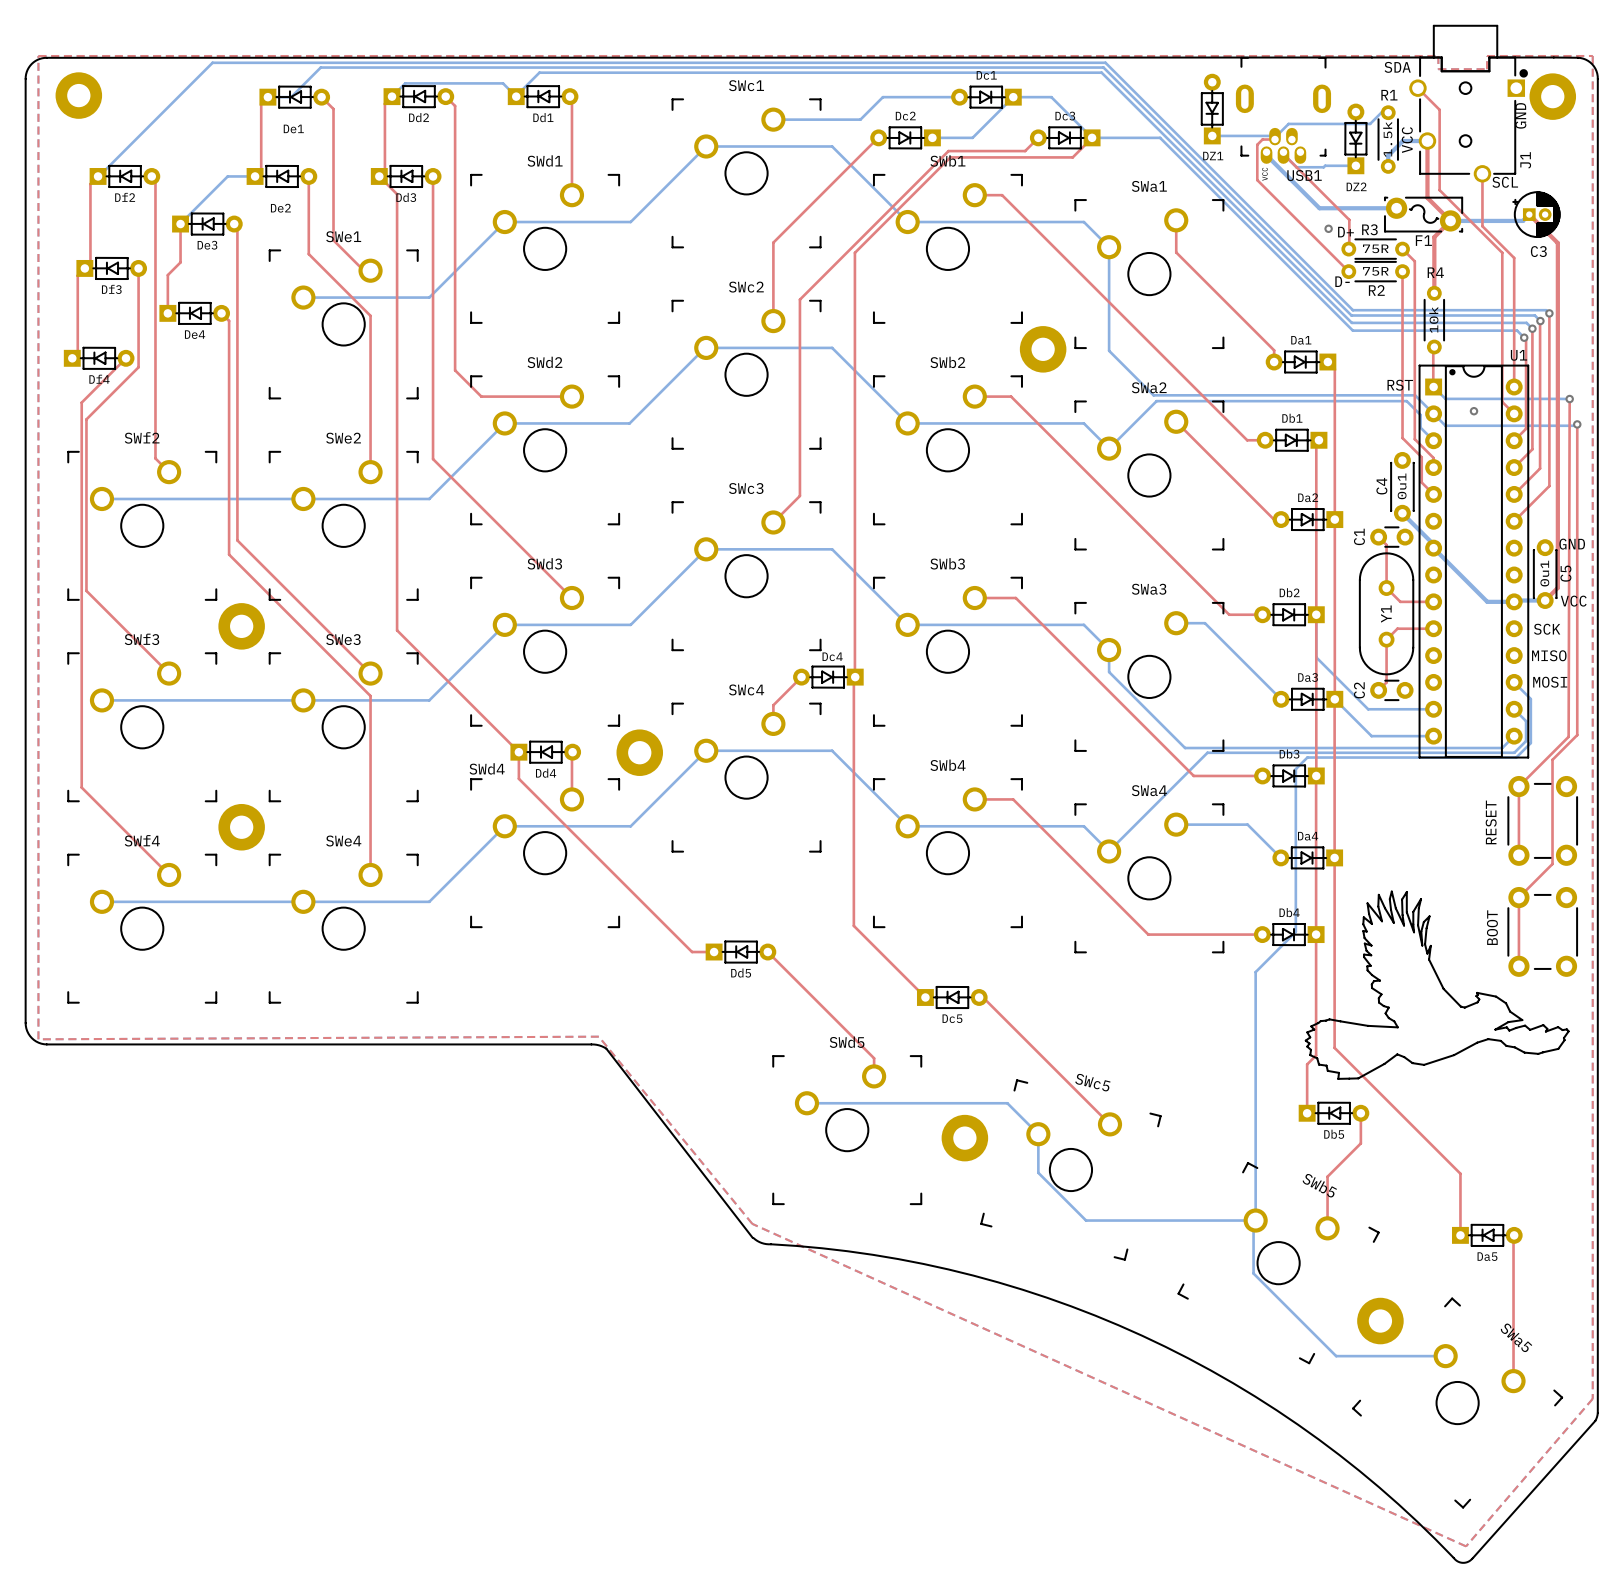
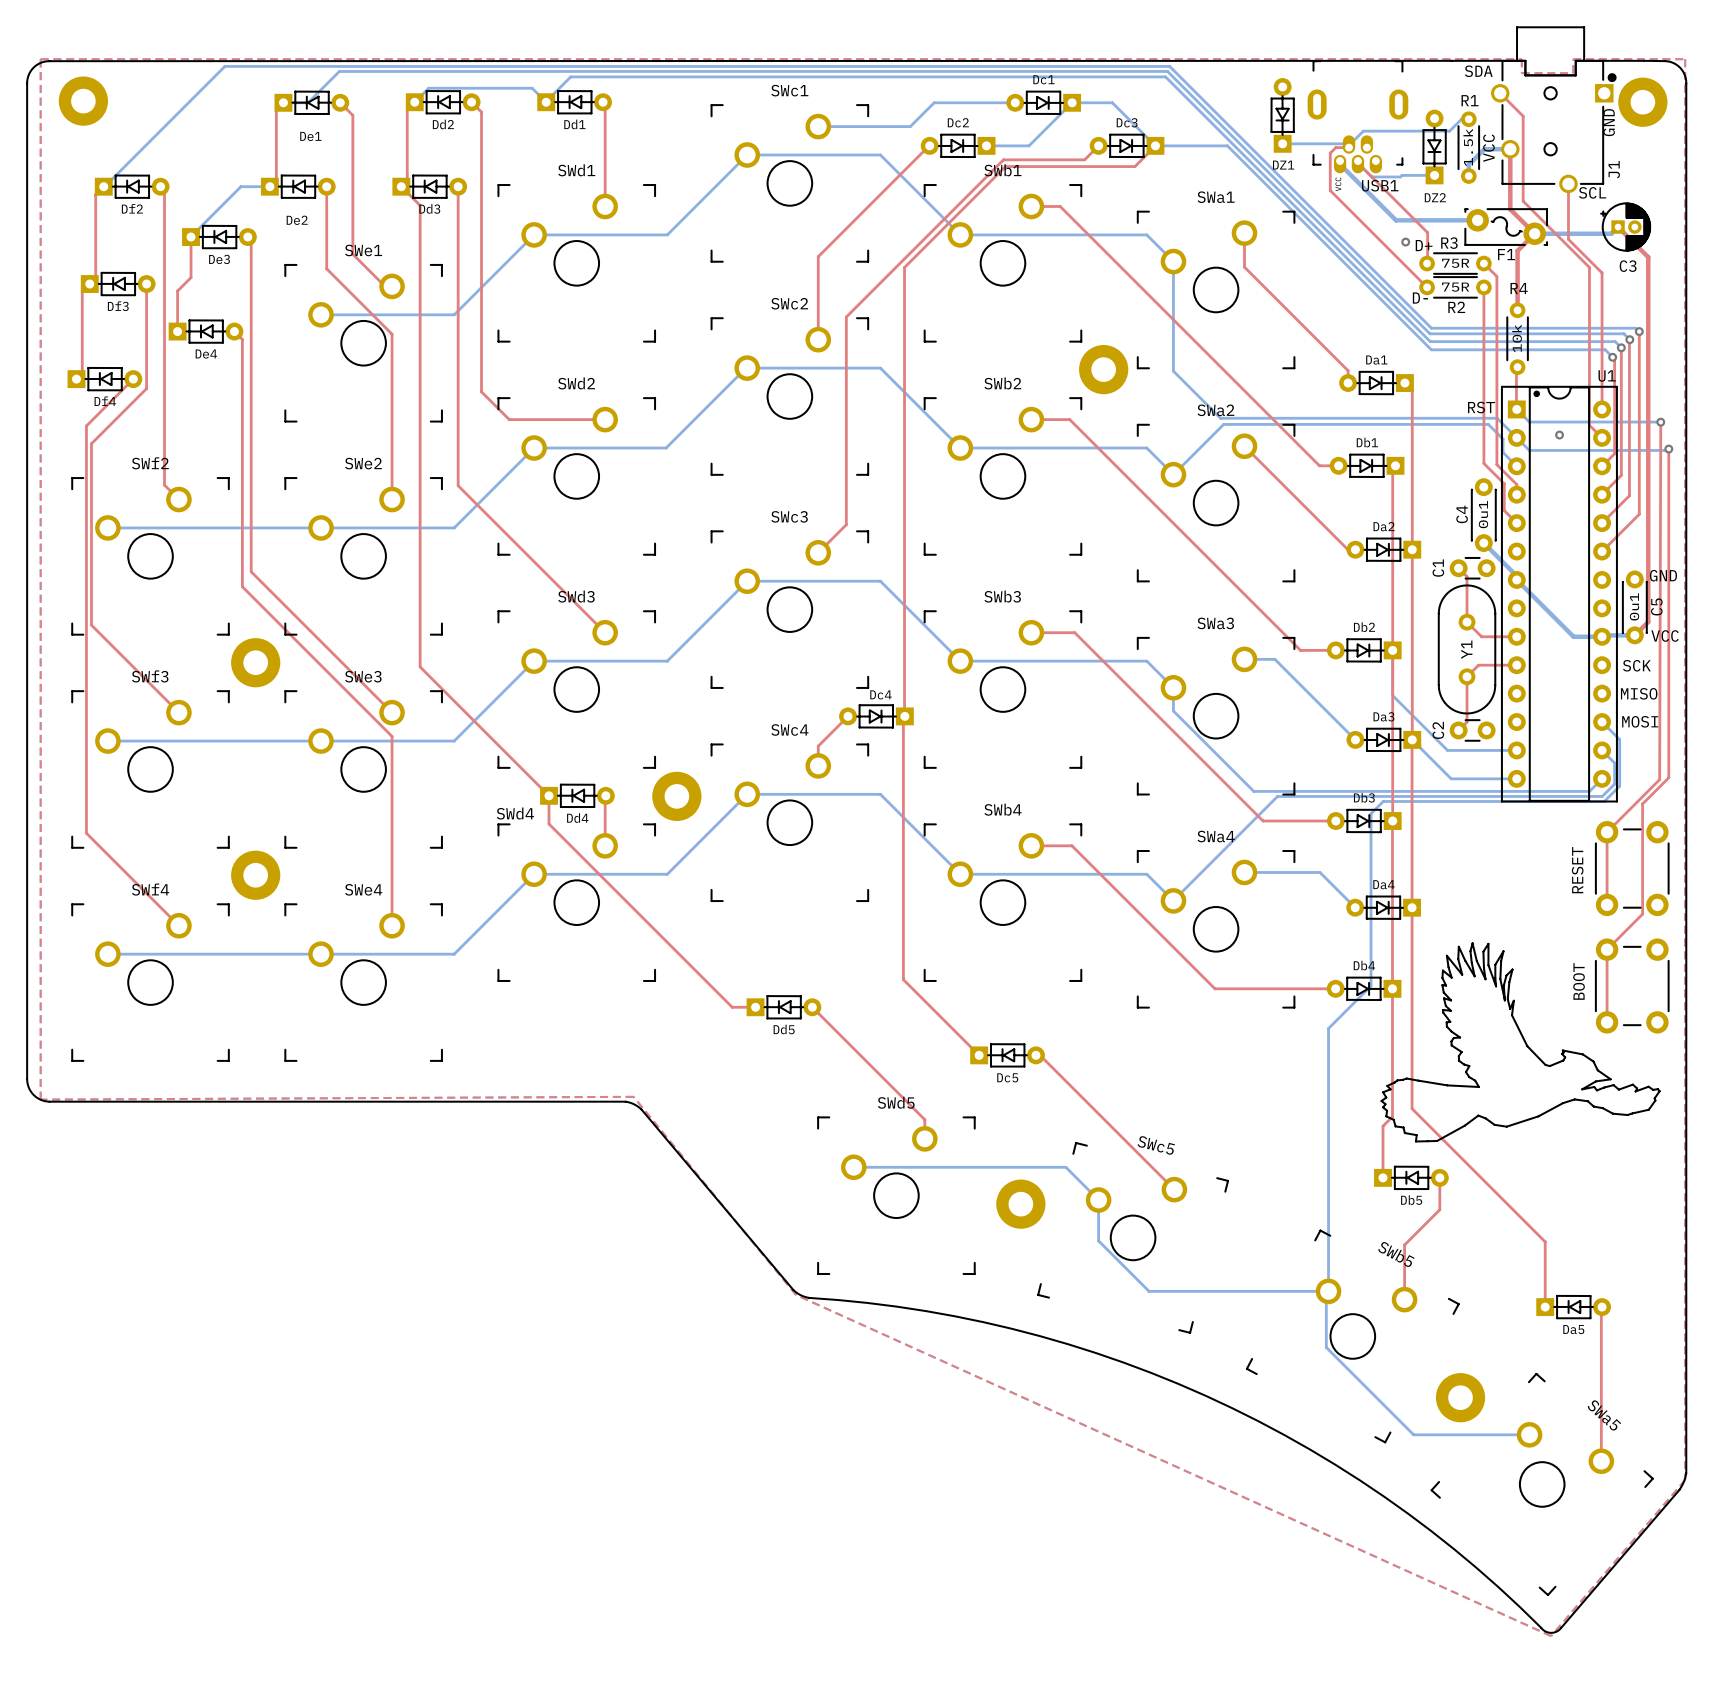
board edge: (1553, 57) (1585, 59) (1593, 66) (1597, 78) (1597, 1413) (1595, 1420) (1472, 1558) -> none
board edge: (25, 1019) (26, 1028) (29, 1035) (38, 1042) (46, 1044) (599, 1045) (606, 1048) (752, 1237) -> (27, 1078) (28, 1087) (33, 1094) (40, 1099) (49, 1101) (631, 1103) (641, 1109) (798, 1293) (809, 1297) (867, 1302) (925, 1311) (1011, 1328) (1096, 1353) (1151, 1372) (1205, 1395) (1284, 1434) (1359, 1480) (1407, 1513) (1454, 1549) (1498, 1587) (1543, 1629) (1549, 1632) (1557, 1630) (1679, 1489) (1686, 1473) (1686, 83) (1683, 72) (1676, 64) (1668, 61) (1643, 60)
board edge: (753, 1238) (766, 1244) (872, 1254) (973, 1275) (1047, 1297) (1142, 1335) (1210, 1370) (1276, 1410) (1318, 1439) (1379, 1487) (1455, 1560) (1464, 1562) (1472, 1558) -> none

